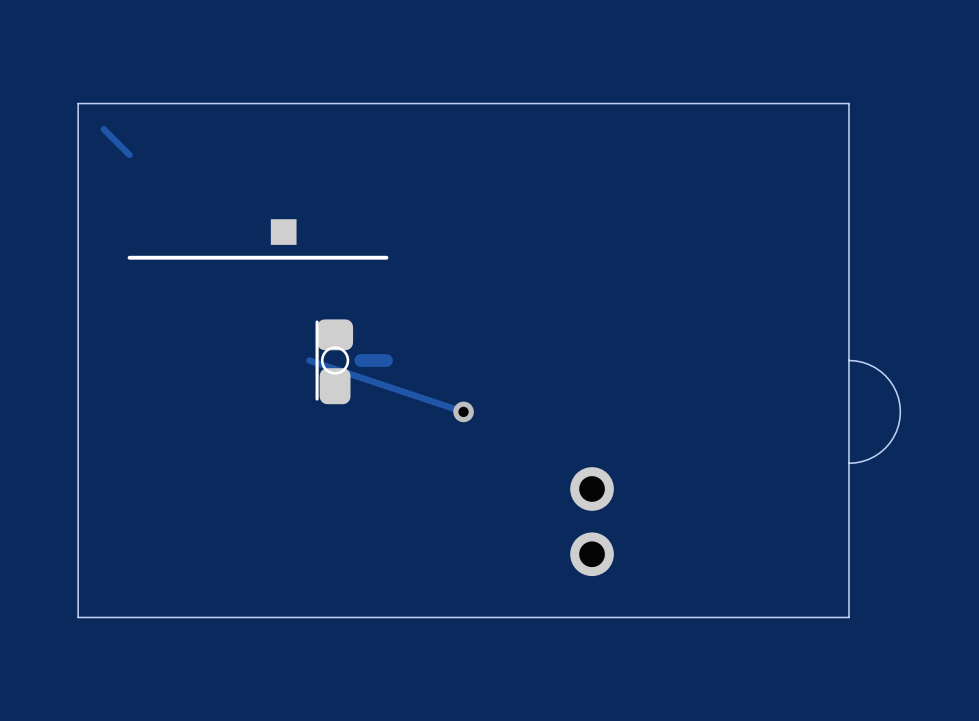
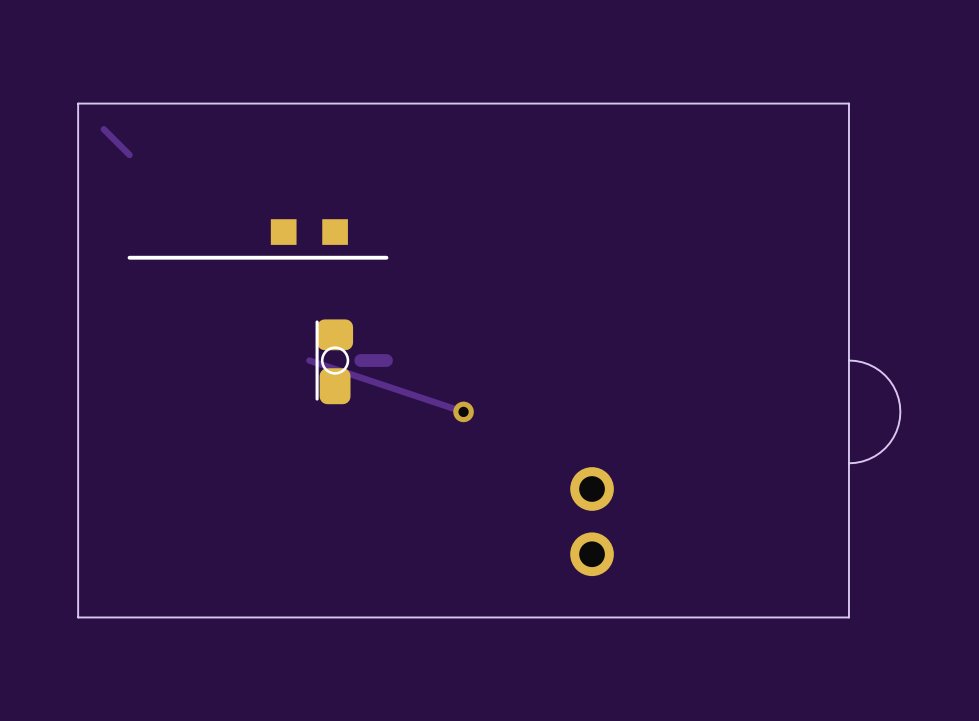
part: none -> (335, 232)

